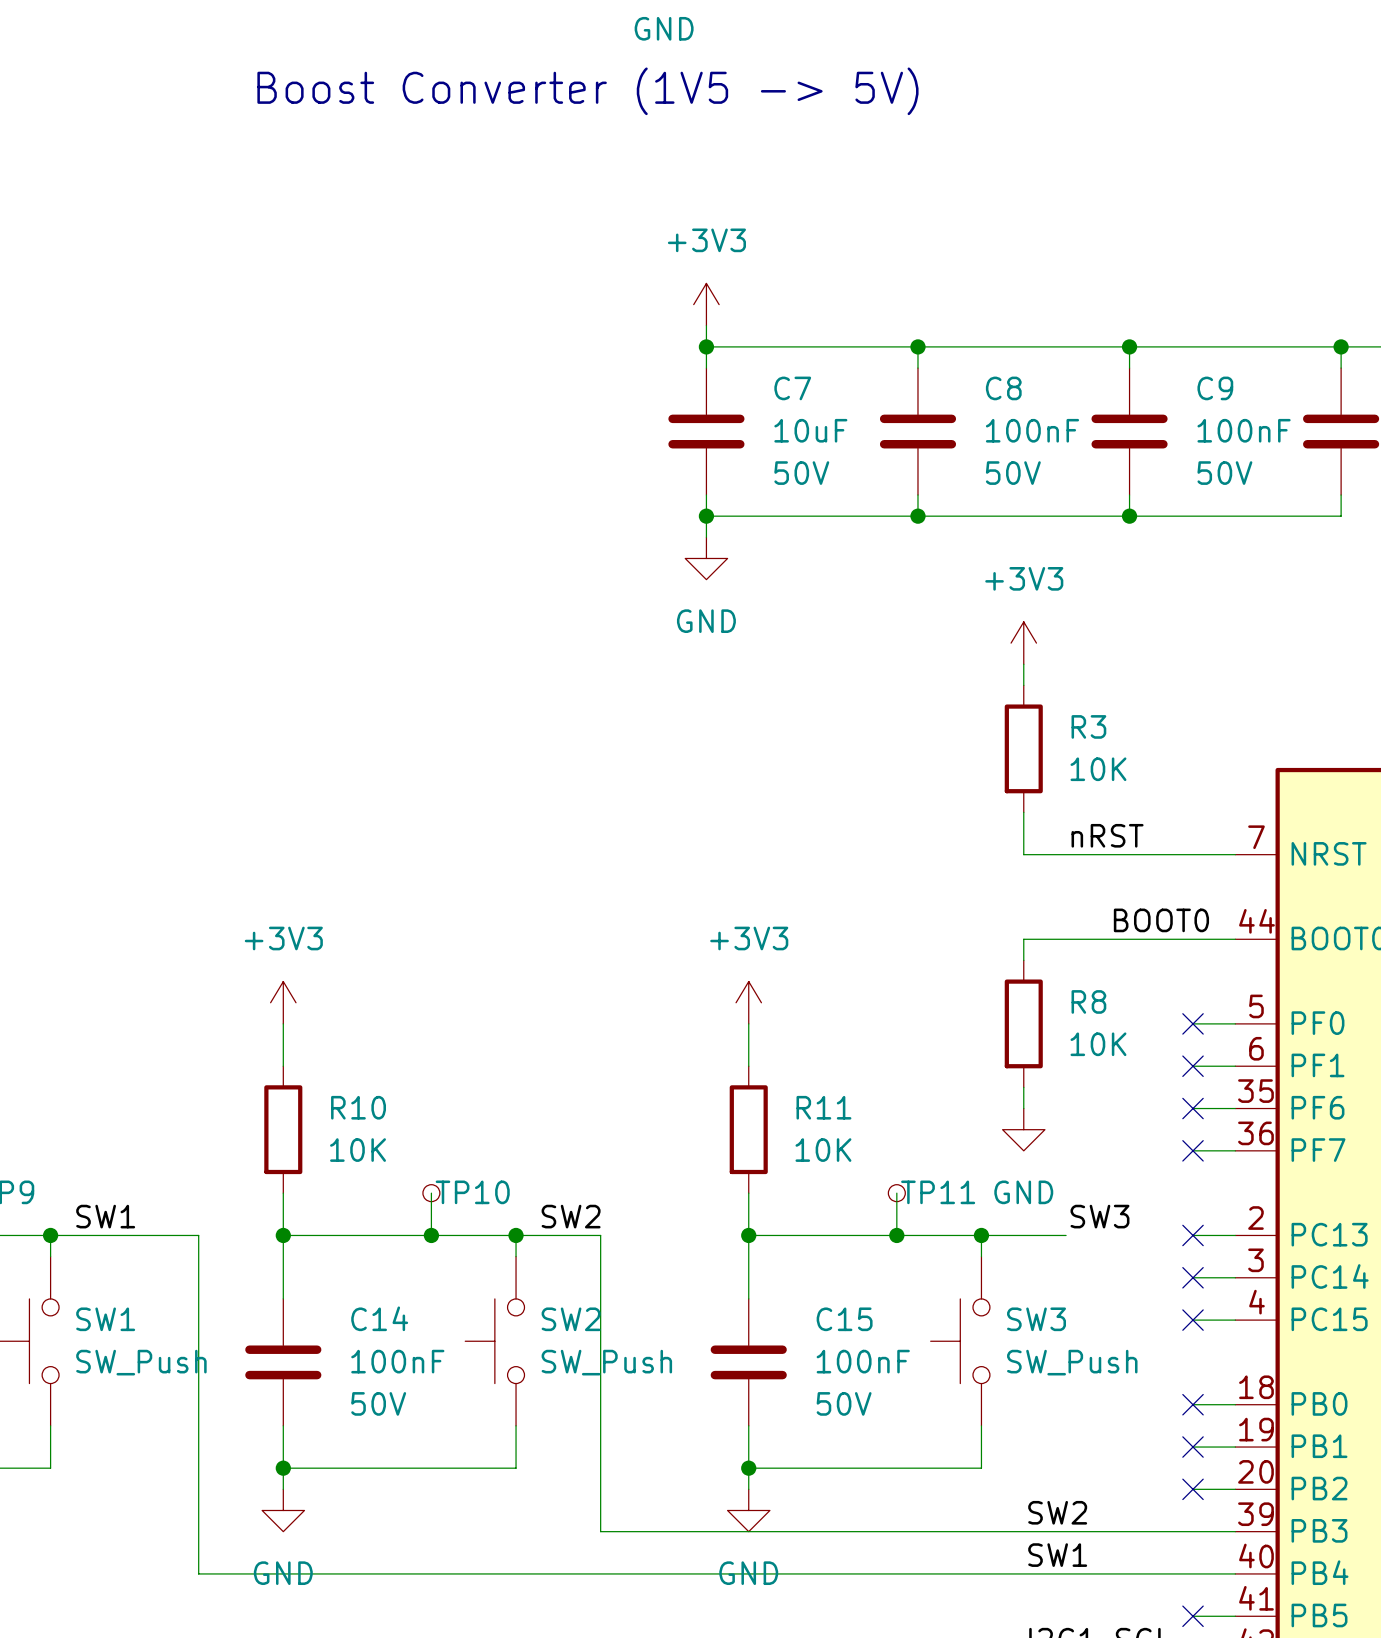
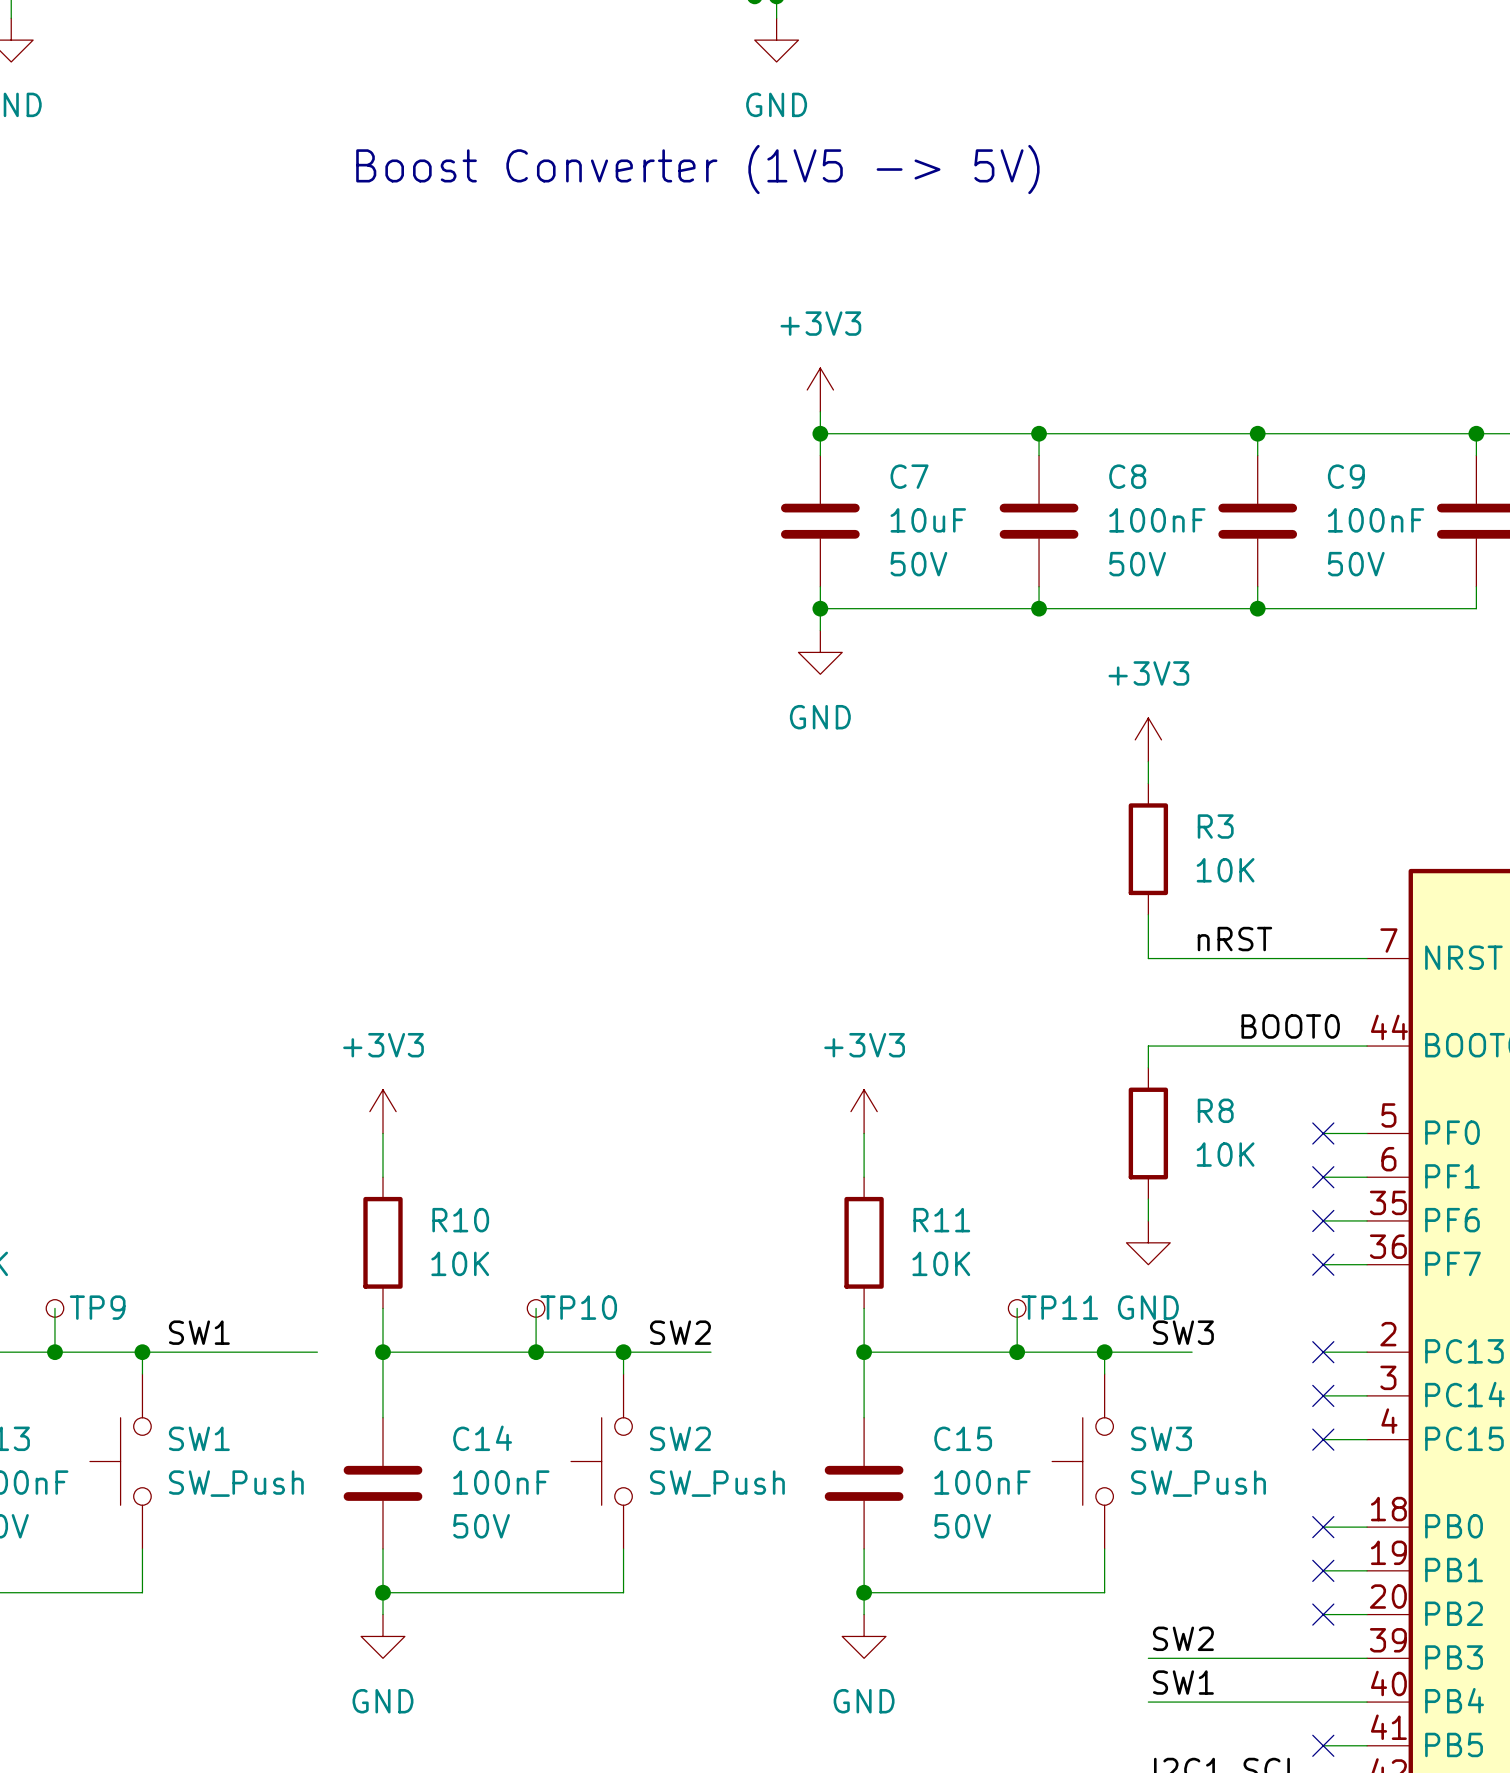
label position: SW3 (1099, 1216) -> SW3 (1183, 1332)
wire: (198, 1235) (198, 1573) (1023, 1573) -> (295, 1352) (317, 1352)
wire: (600, 1235) (600, 1531) (1023, 1531) -> none

